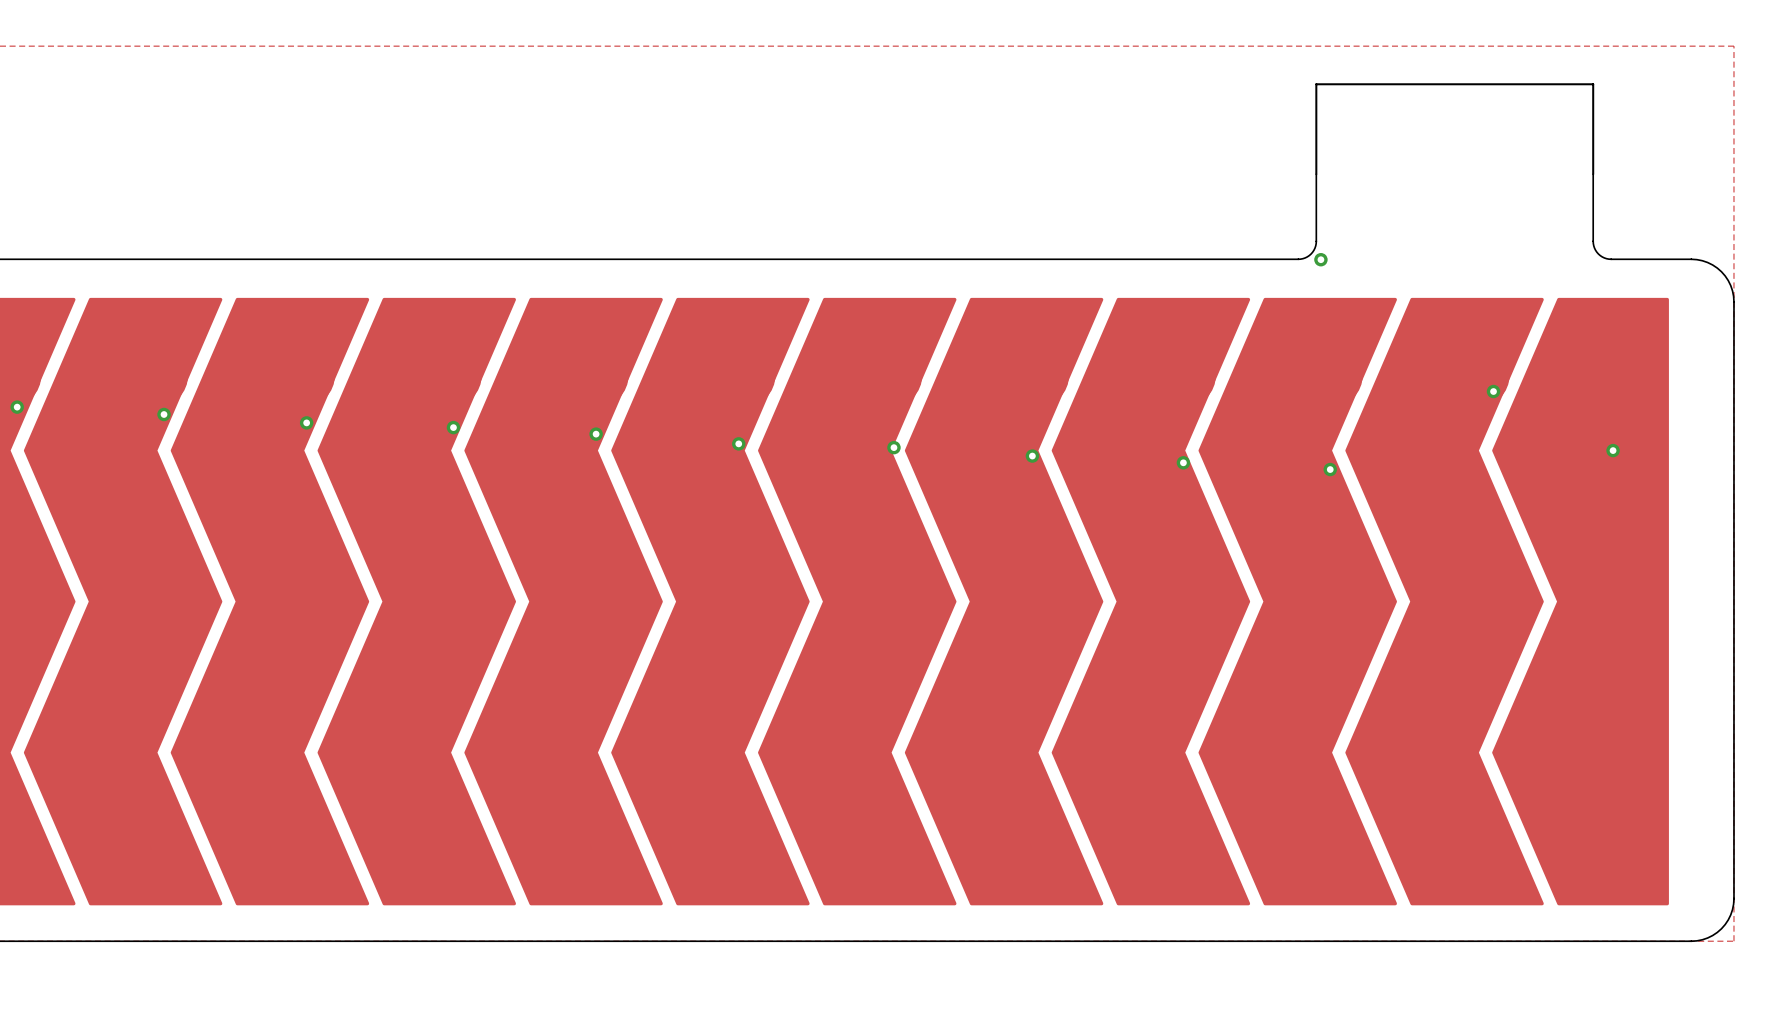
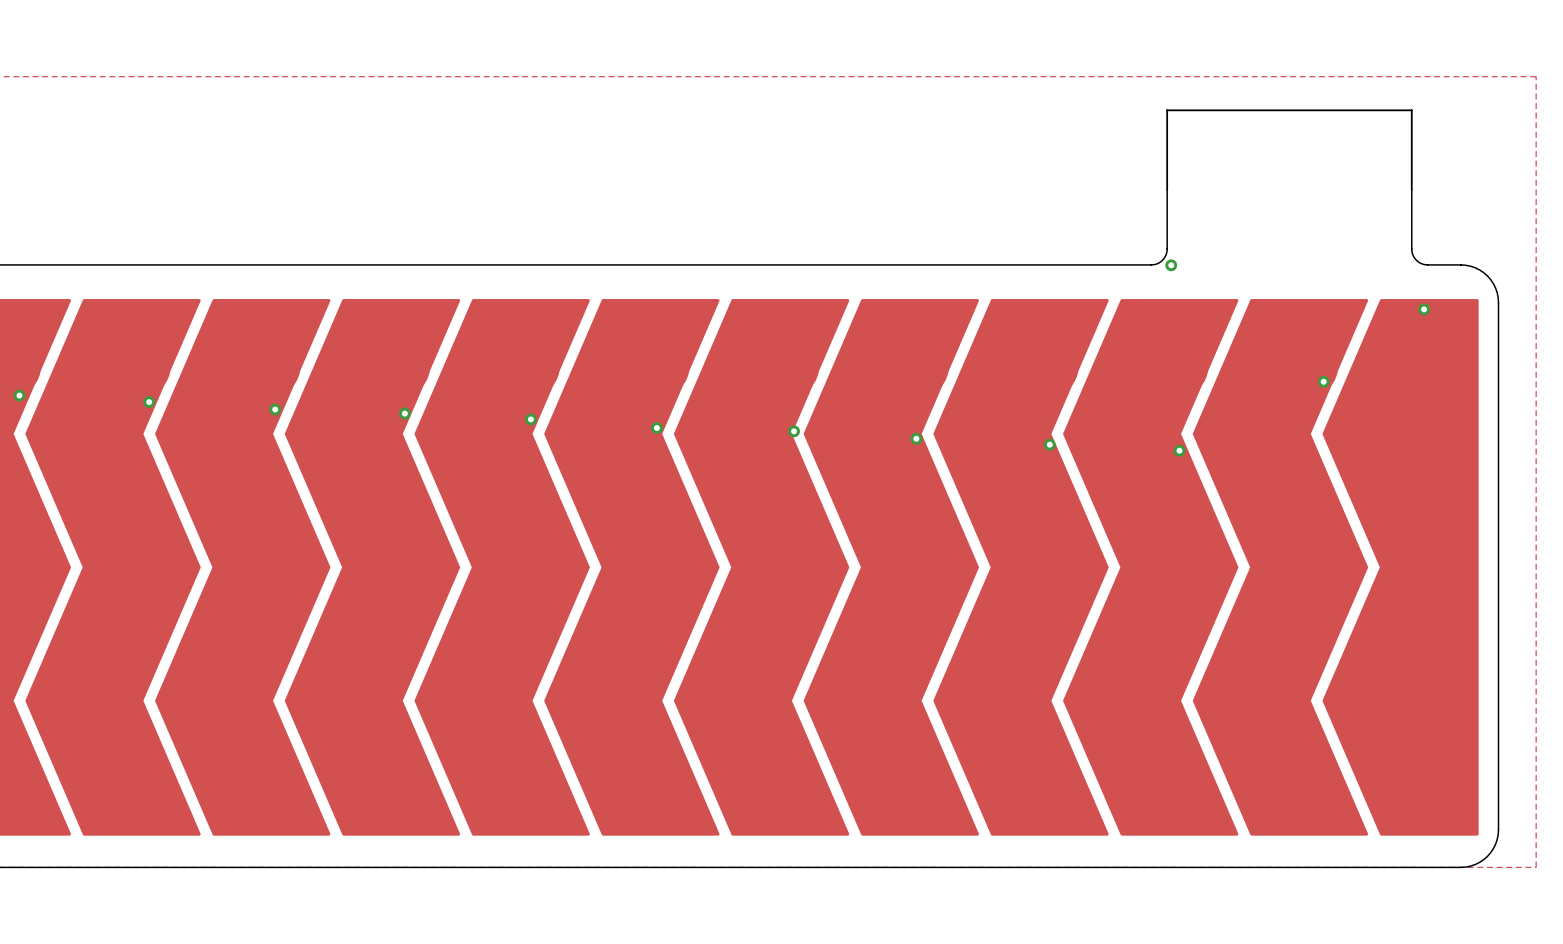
board edge: (1648, 259) (1696, 259) (1712, 264) (1728, 280) (1733, 301) (1733, 904) (1725, 924) (1707, 937) (1691, 941) (1648, 941) -> (1460, 264) (1475, 267) (1487, 275) (1495, 288) (1498, 302) (1498, 834) (1495, 844) (1487, 856) (1475, 864) (1460, 867)
via: none -> (1424, 309)
via: (1613, 450) -> none

